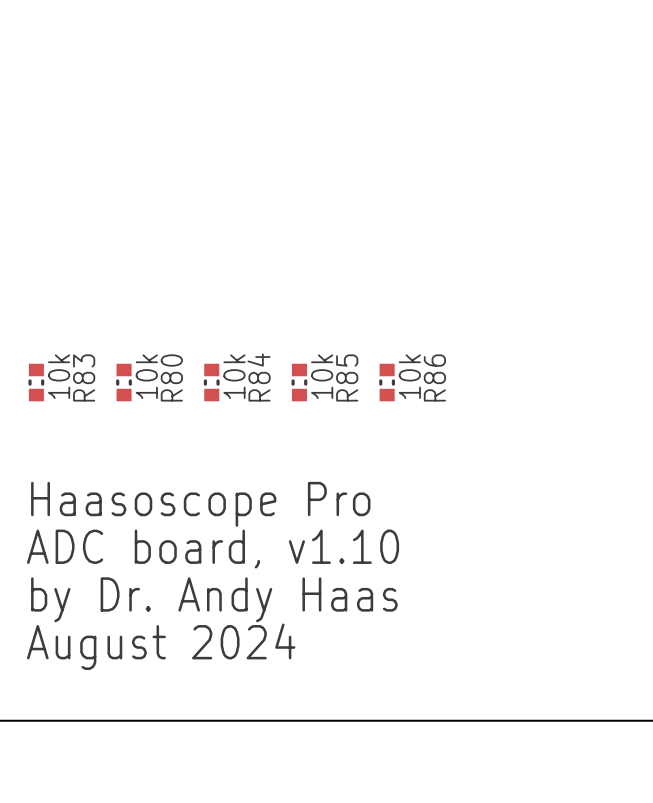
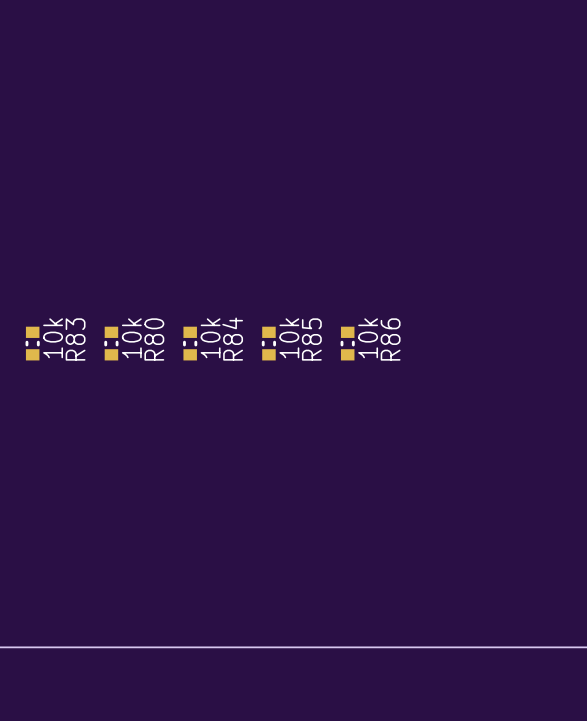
text: Haasoscope Pro (200, 504) -> none
text: ADC board, v1.10 (213, 549) -> none
text: by Dr. Andy Haas (214, 599) -> none
text: August 2024 (161, 646) -> none

